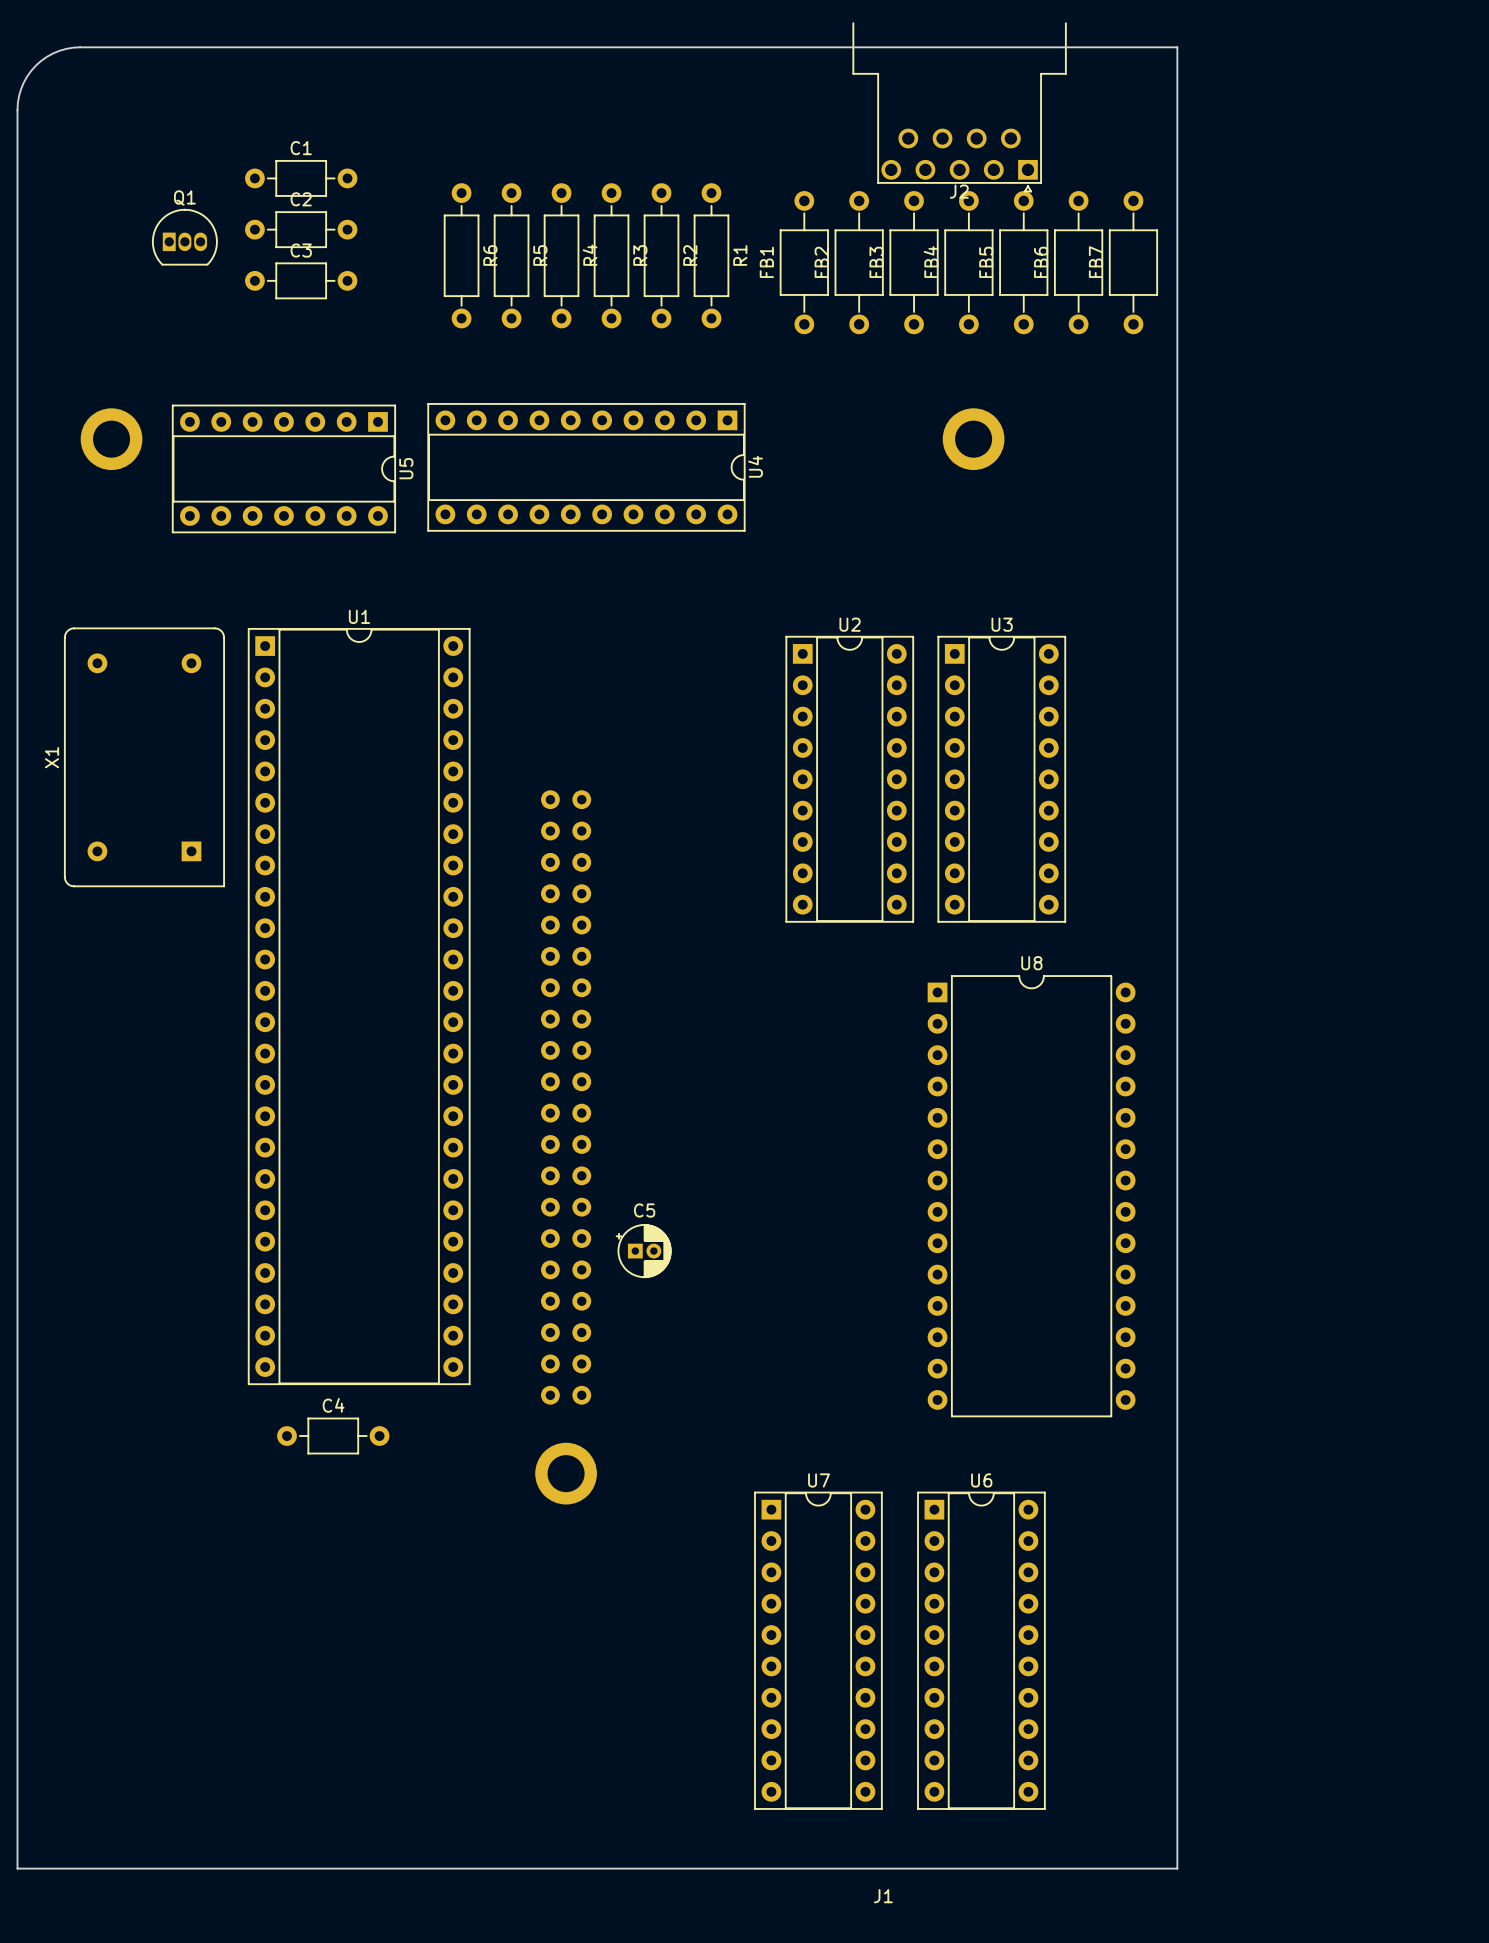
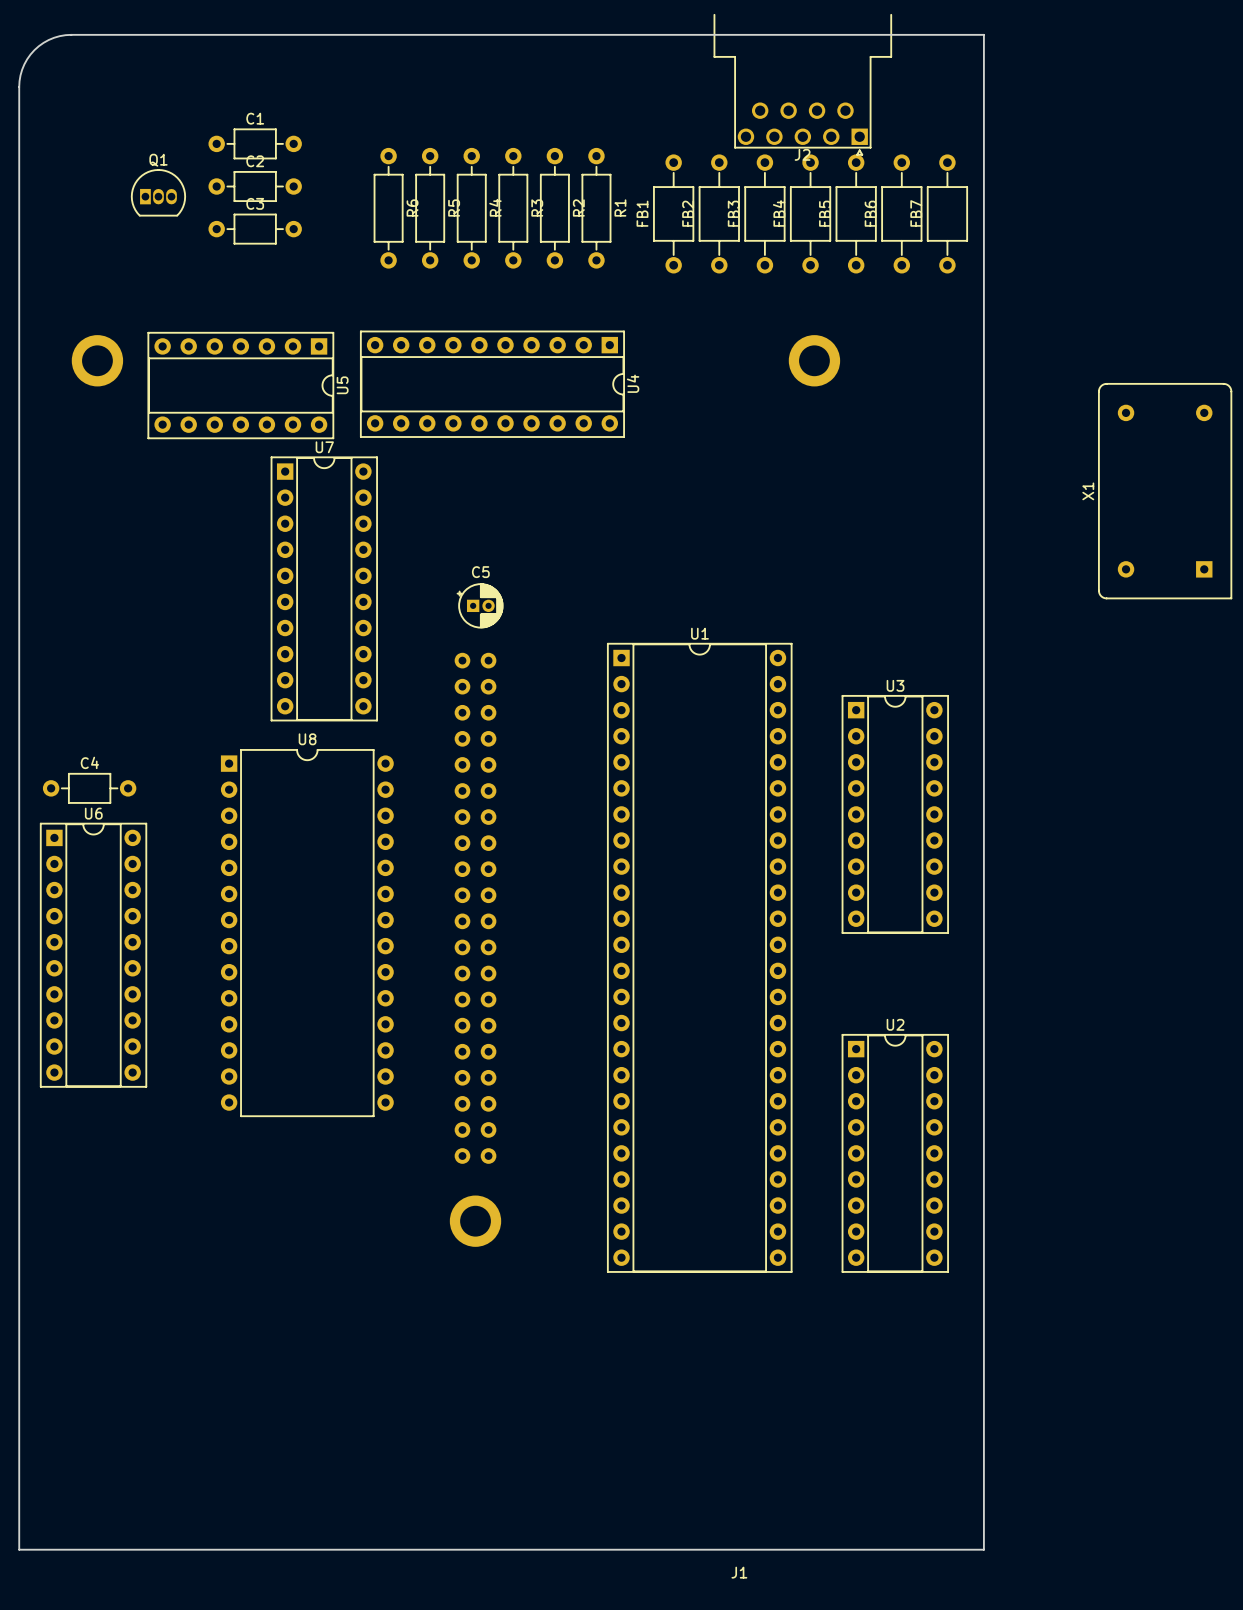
X1 position: (144, 757) -> (1165, 491)
U2 position: (849, 779) -> (895, 1153)
U3 position: (1001, 779) -> (895, 814)
U1 position: (359, 1006) -> (699, 957)
U8 position: (1031, 1196) -> (307, 933)
C5 position: (643, 1251) -> (480, 605)
C4 position: (333, 1436) -> (89, 788)
U7 position: (818, 1650) -> (324, 588)
U6 position: (981, 1650) -> (93, 955)

